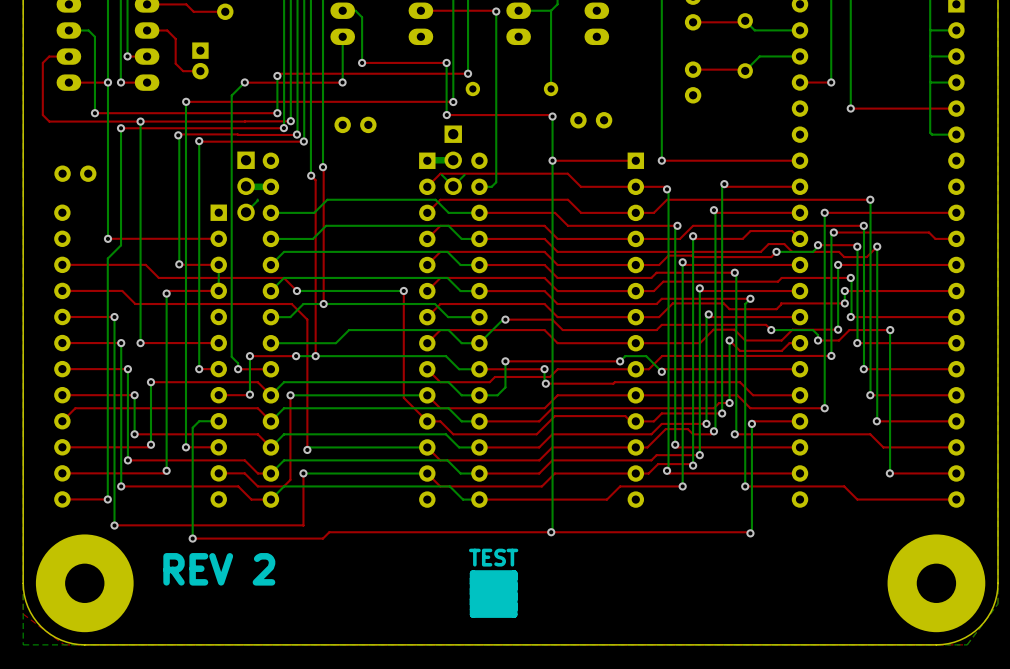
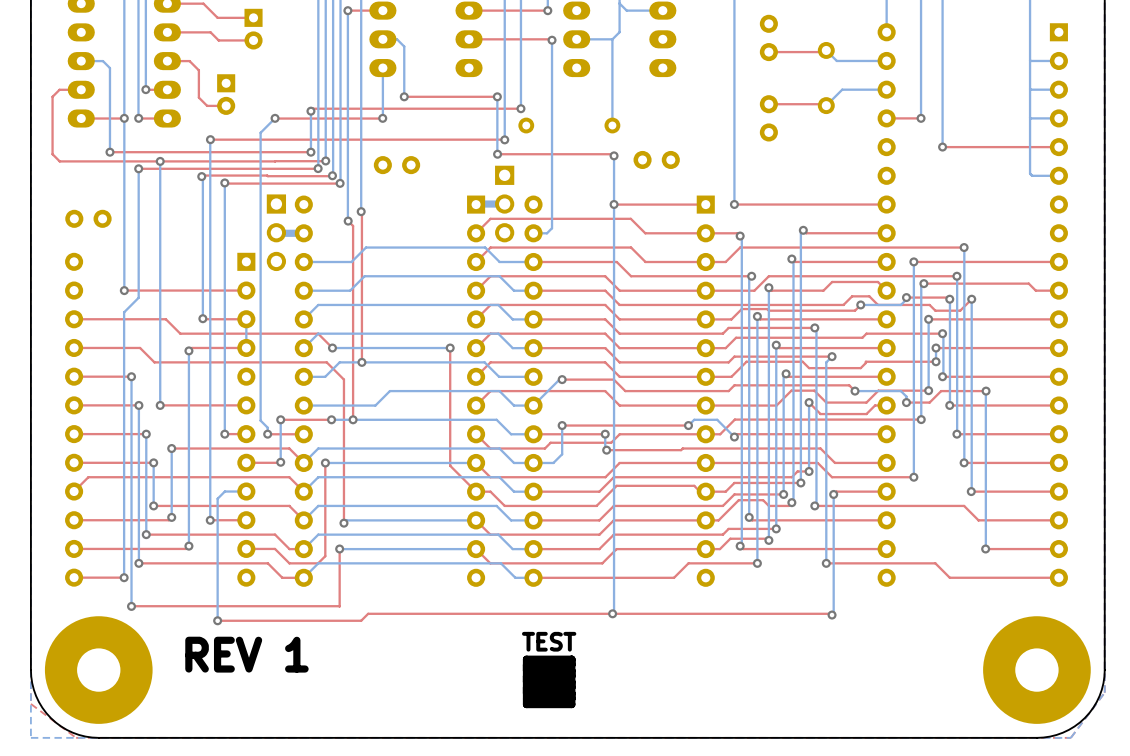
bottom track: (464, 174) (453, 186) (441, 174) -> none
bottom track: (257, 199) (246, 212) -> none
text: REV 2 (219, 569) -> REV 1 (246, 654)

